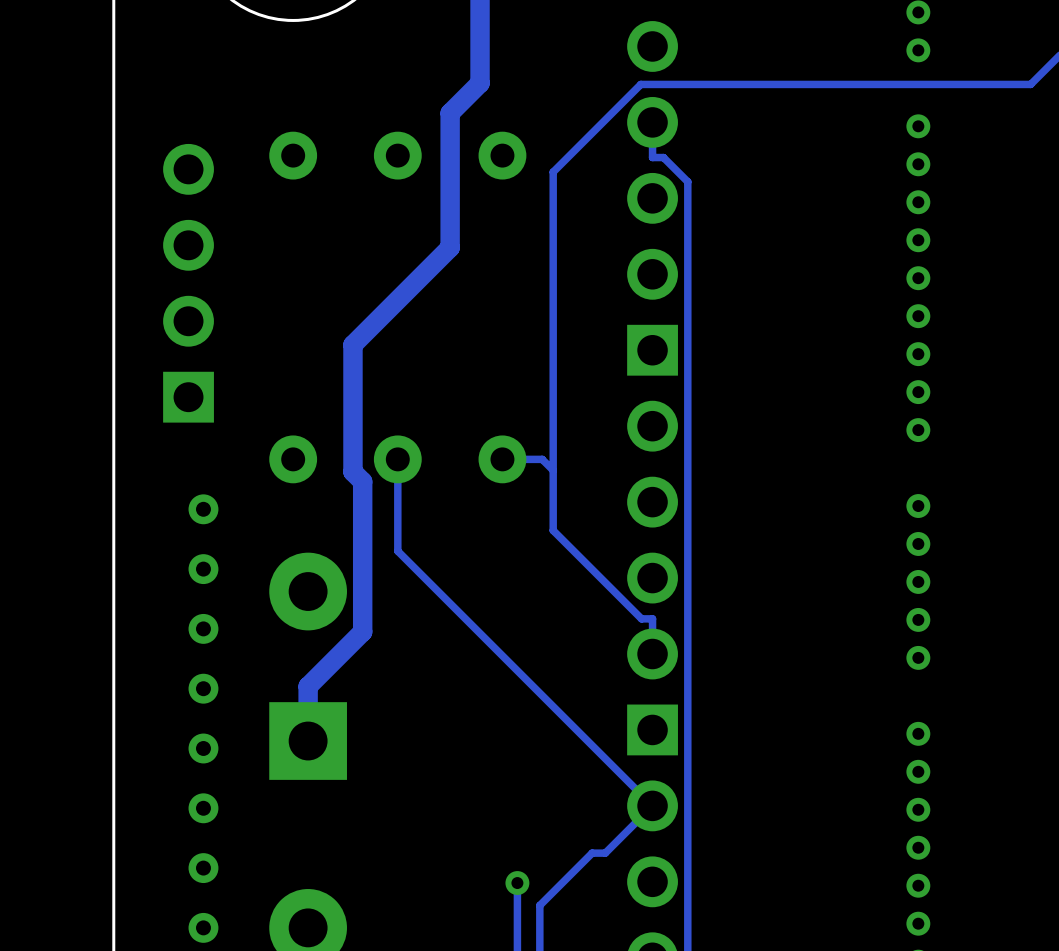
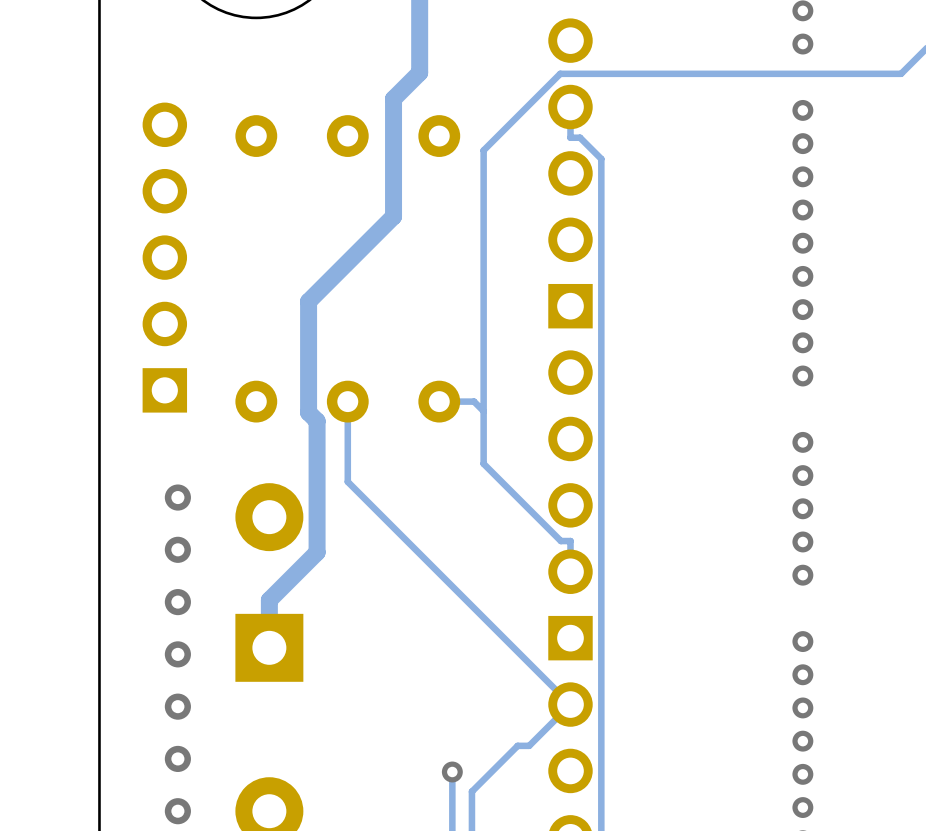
part footprint: [163, 143, 214, 423] -> [142, 102, 188, 413]
via: (203, 509) -> none

